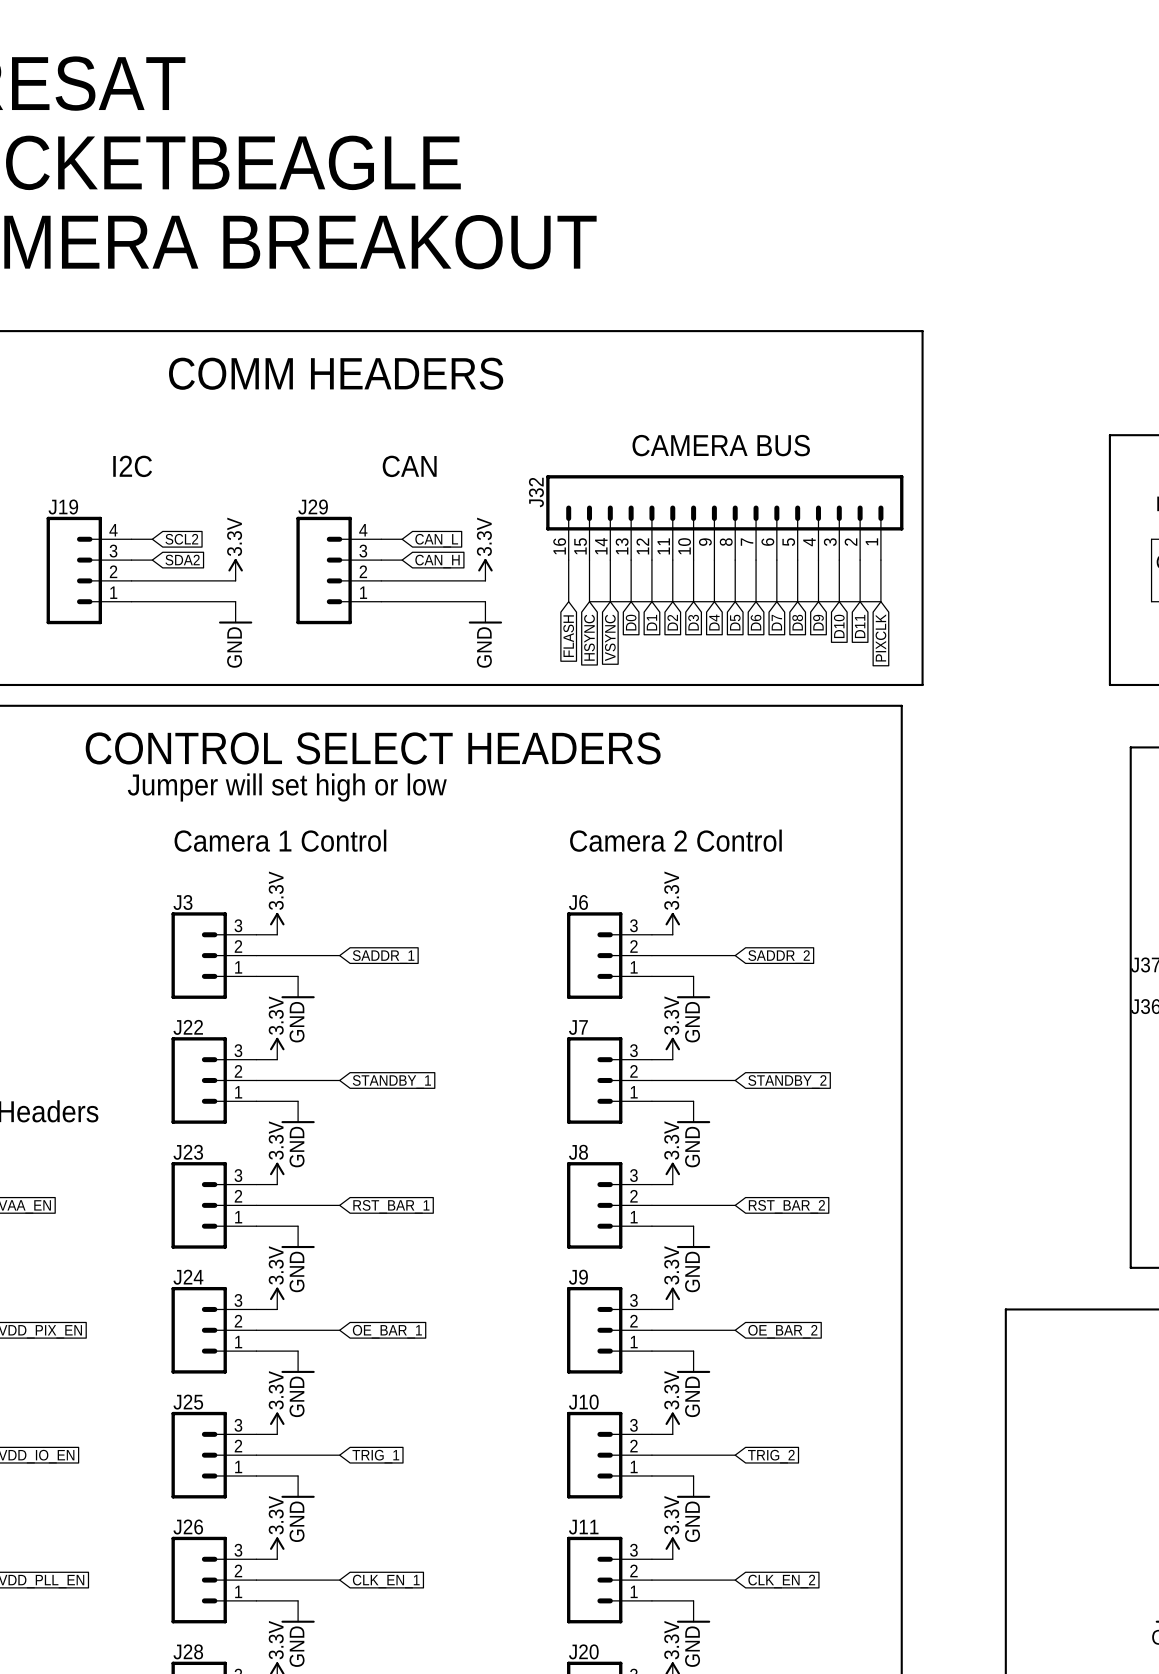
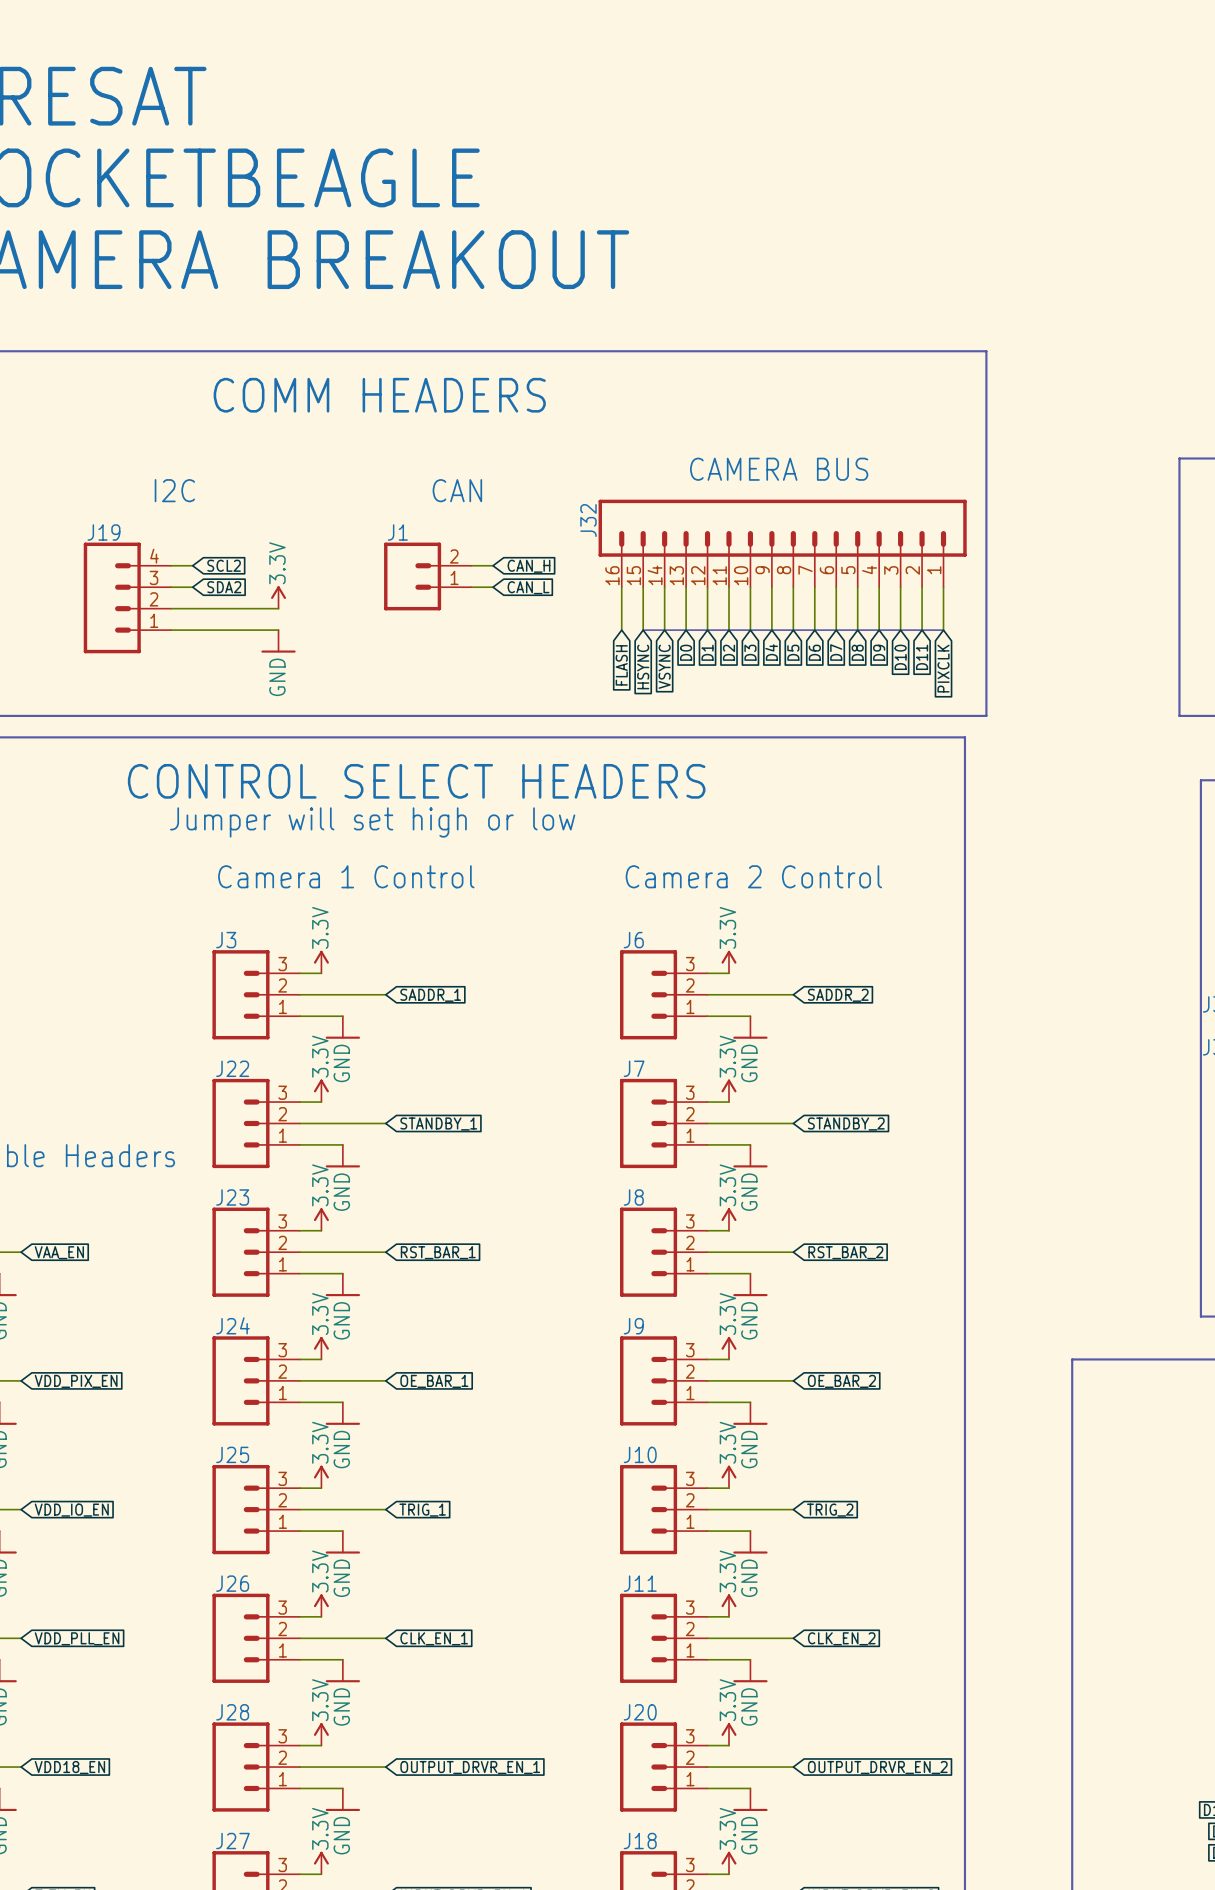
global label position: CAN_L (436, 540) -> CAN_L (528, 587)
J1: none -> (427, 576)
global label position: CAN_H (437, 561) -> CAN_H (528, 566)
power symbol: 3.3V (485, 569) -> none
J29: (338, 570) -> none
wire: (381, 580) (485, 580) -> none
wire: (381, 601) (485, 601) -> none
power symbol: GND (485, 612) -> none

